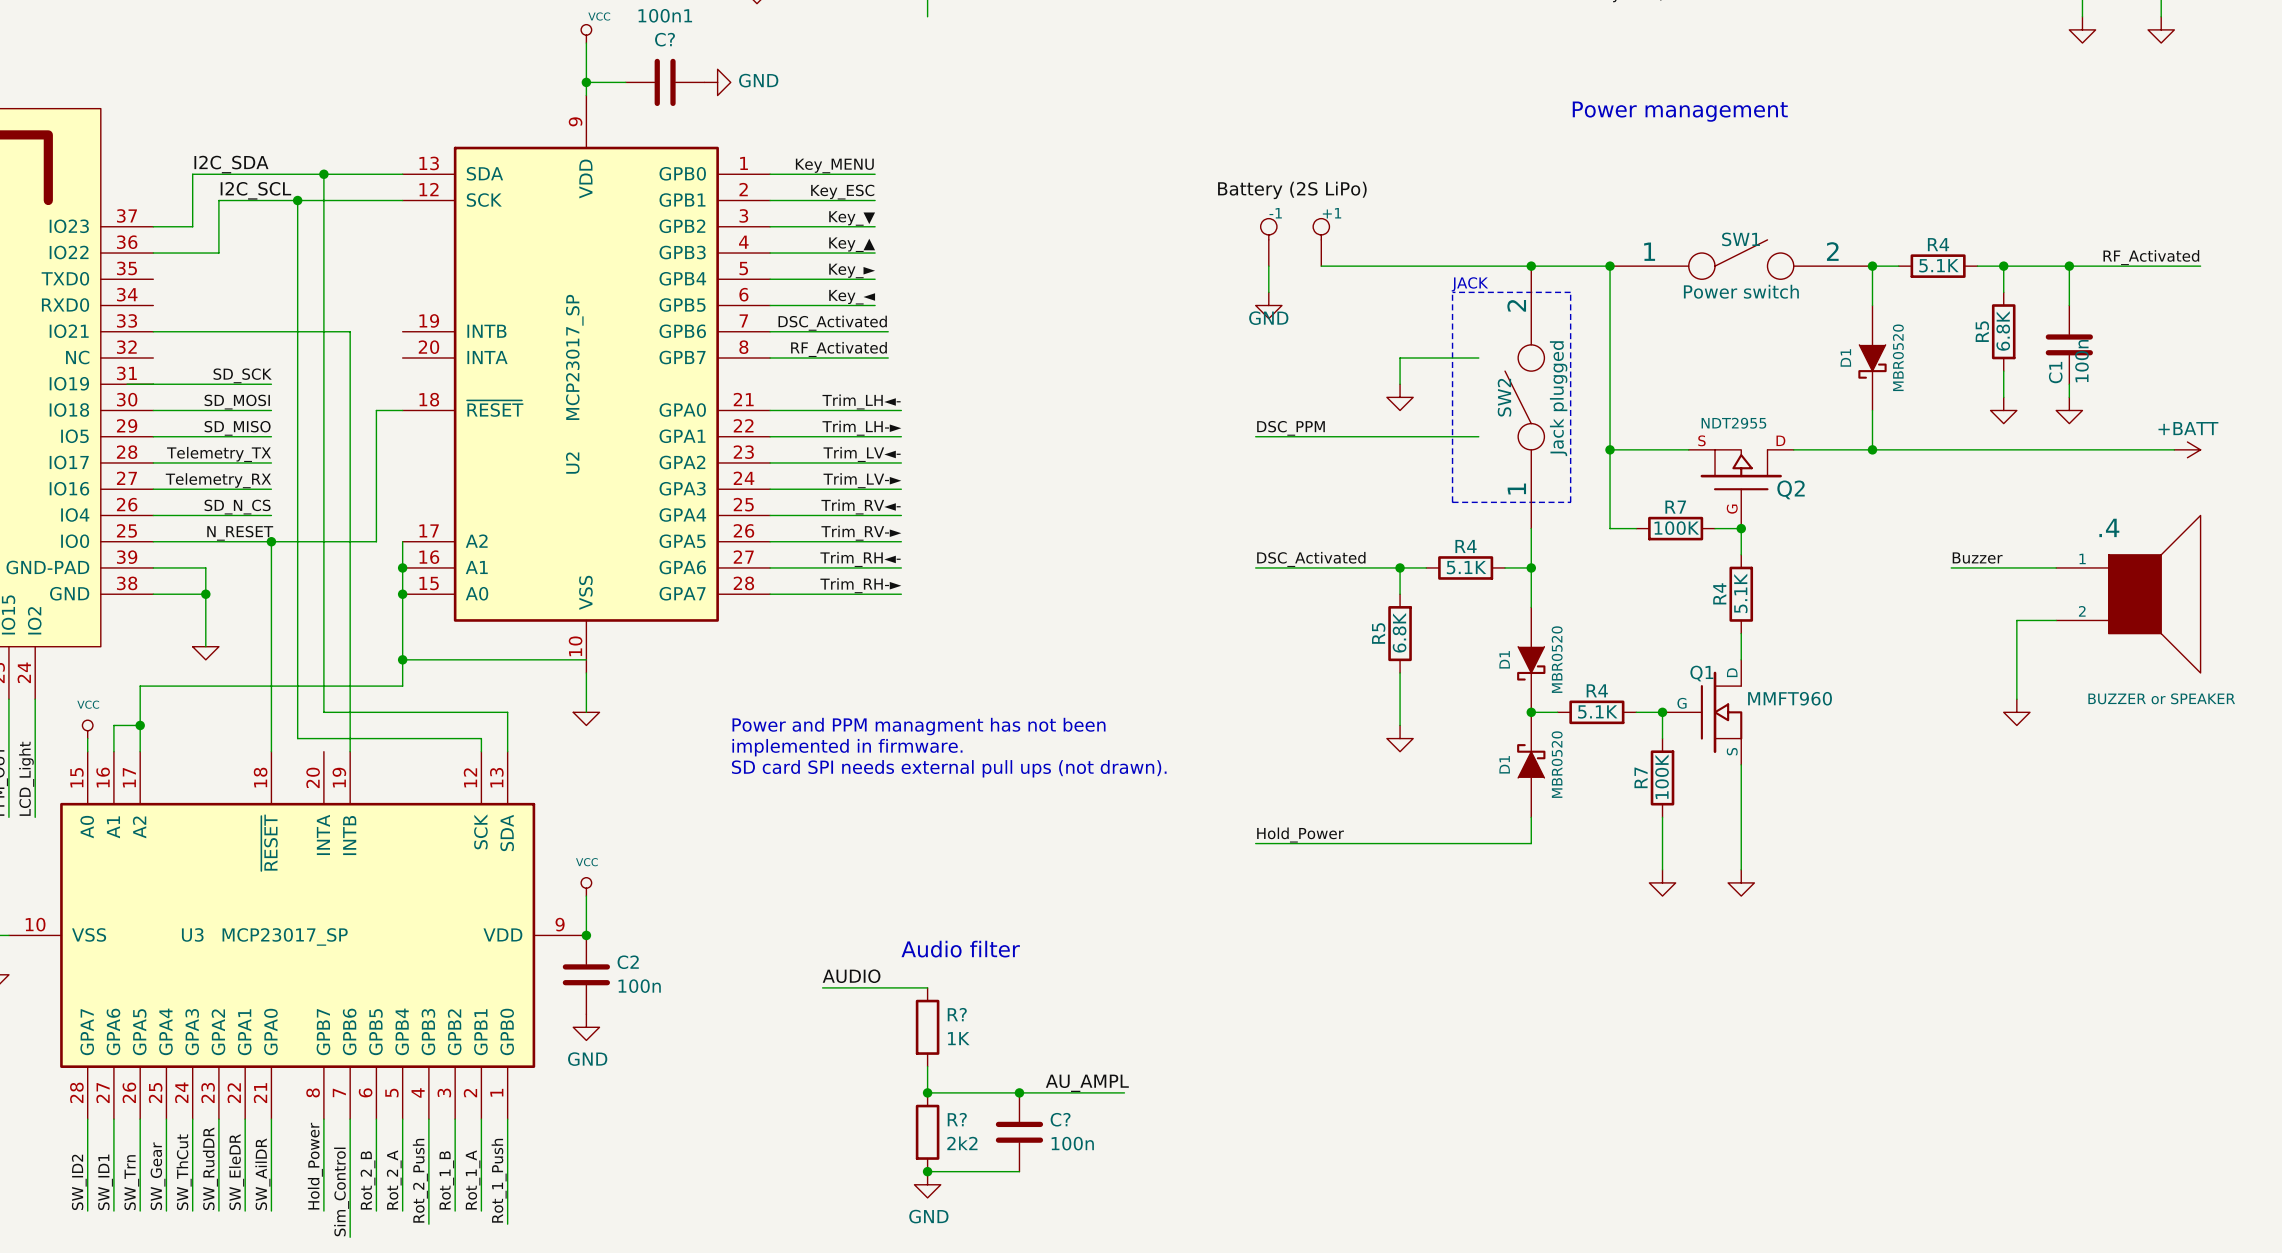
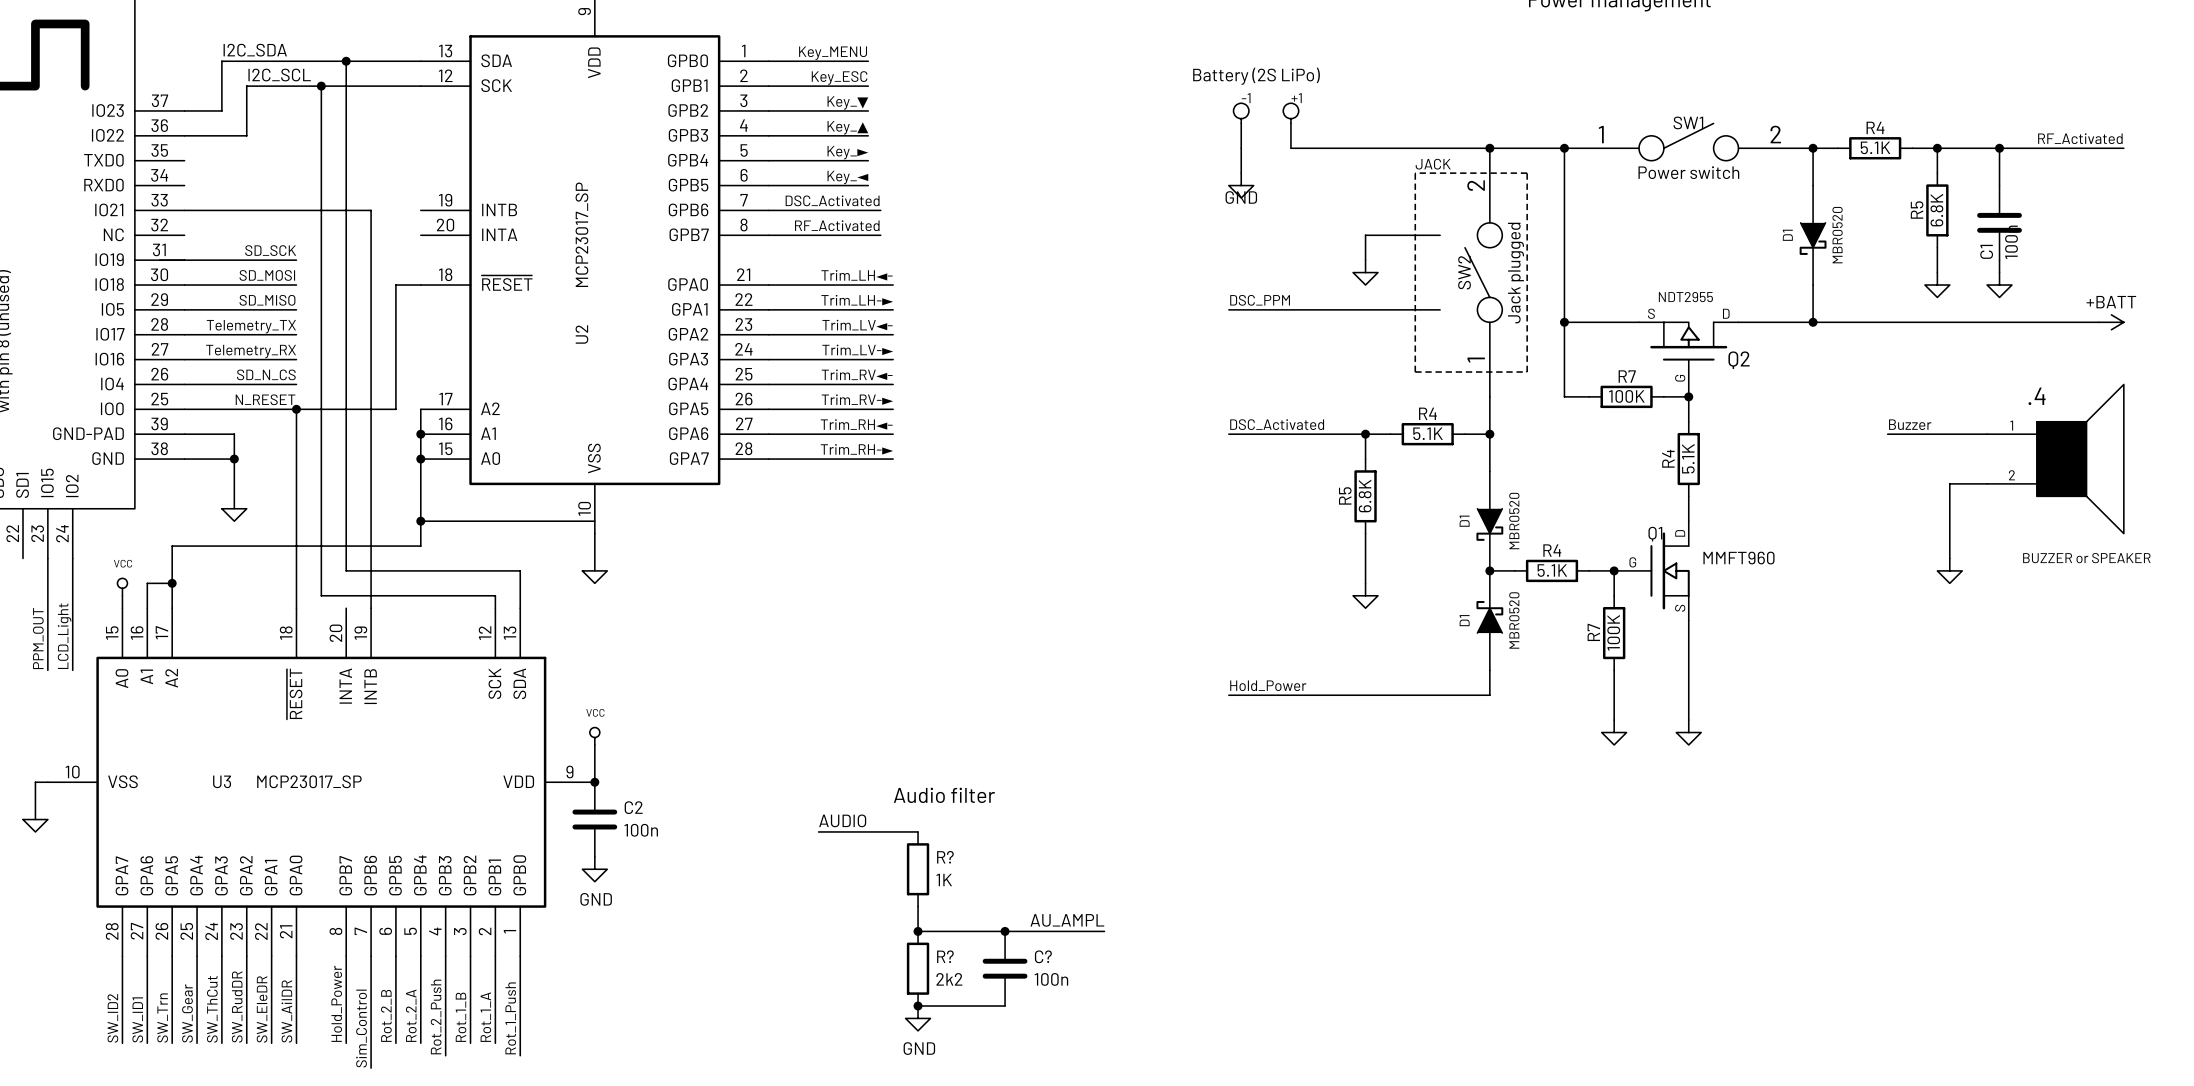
text: Power and PPM managment has not been (919, 726) -> none
text: implemented in firmware. (847, 747) -> none
text: SD card SPI needs external pull ups (not drawn). (949, 768) -> none

